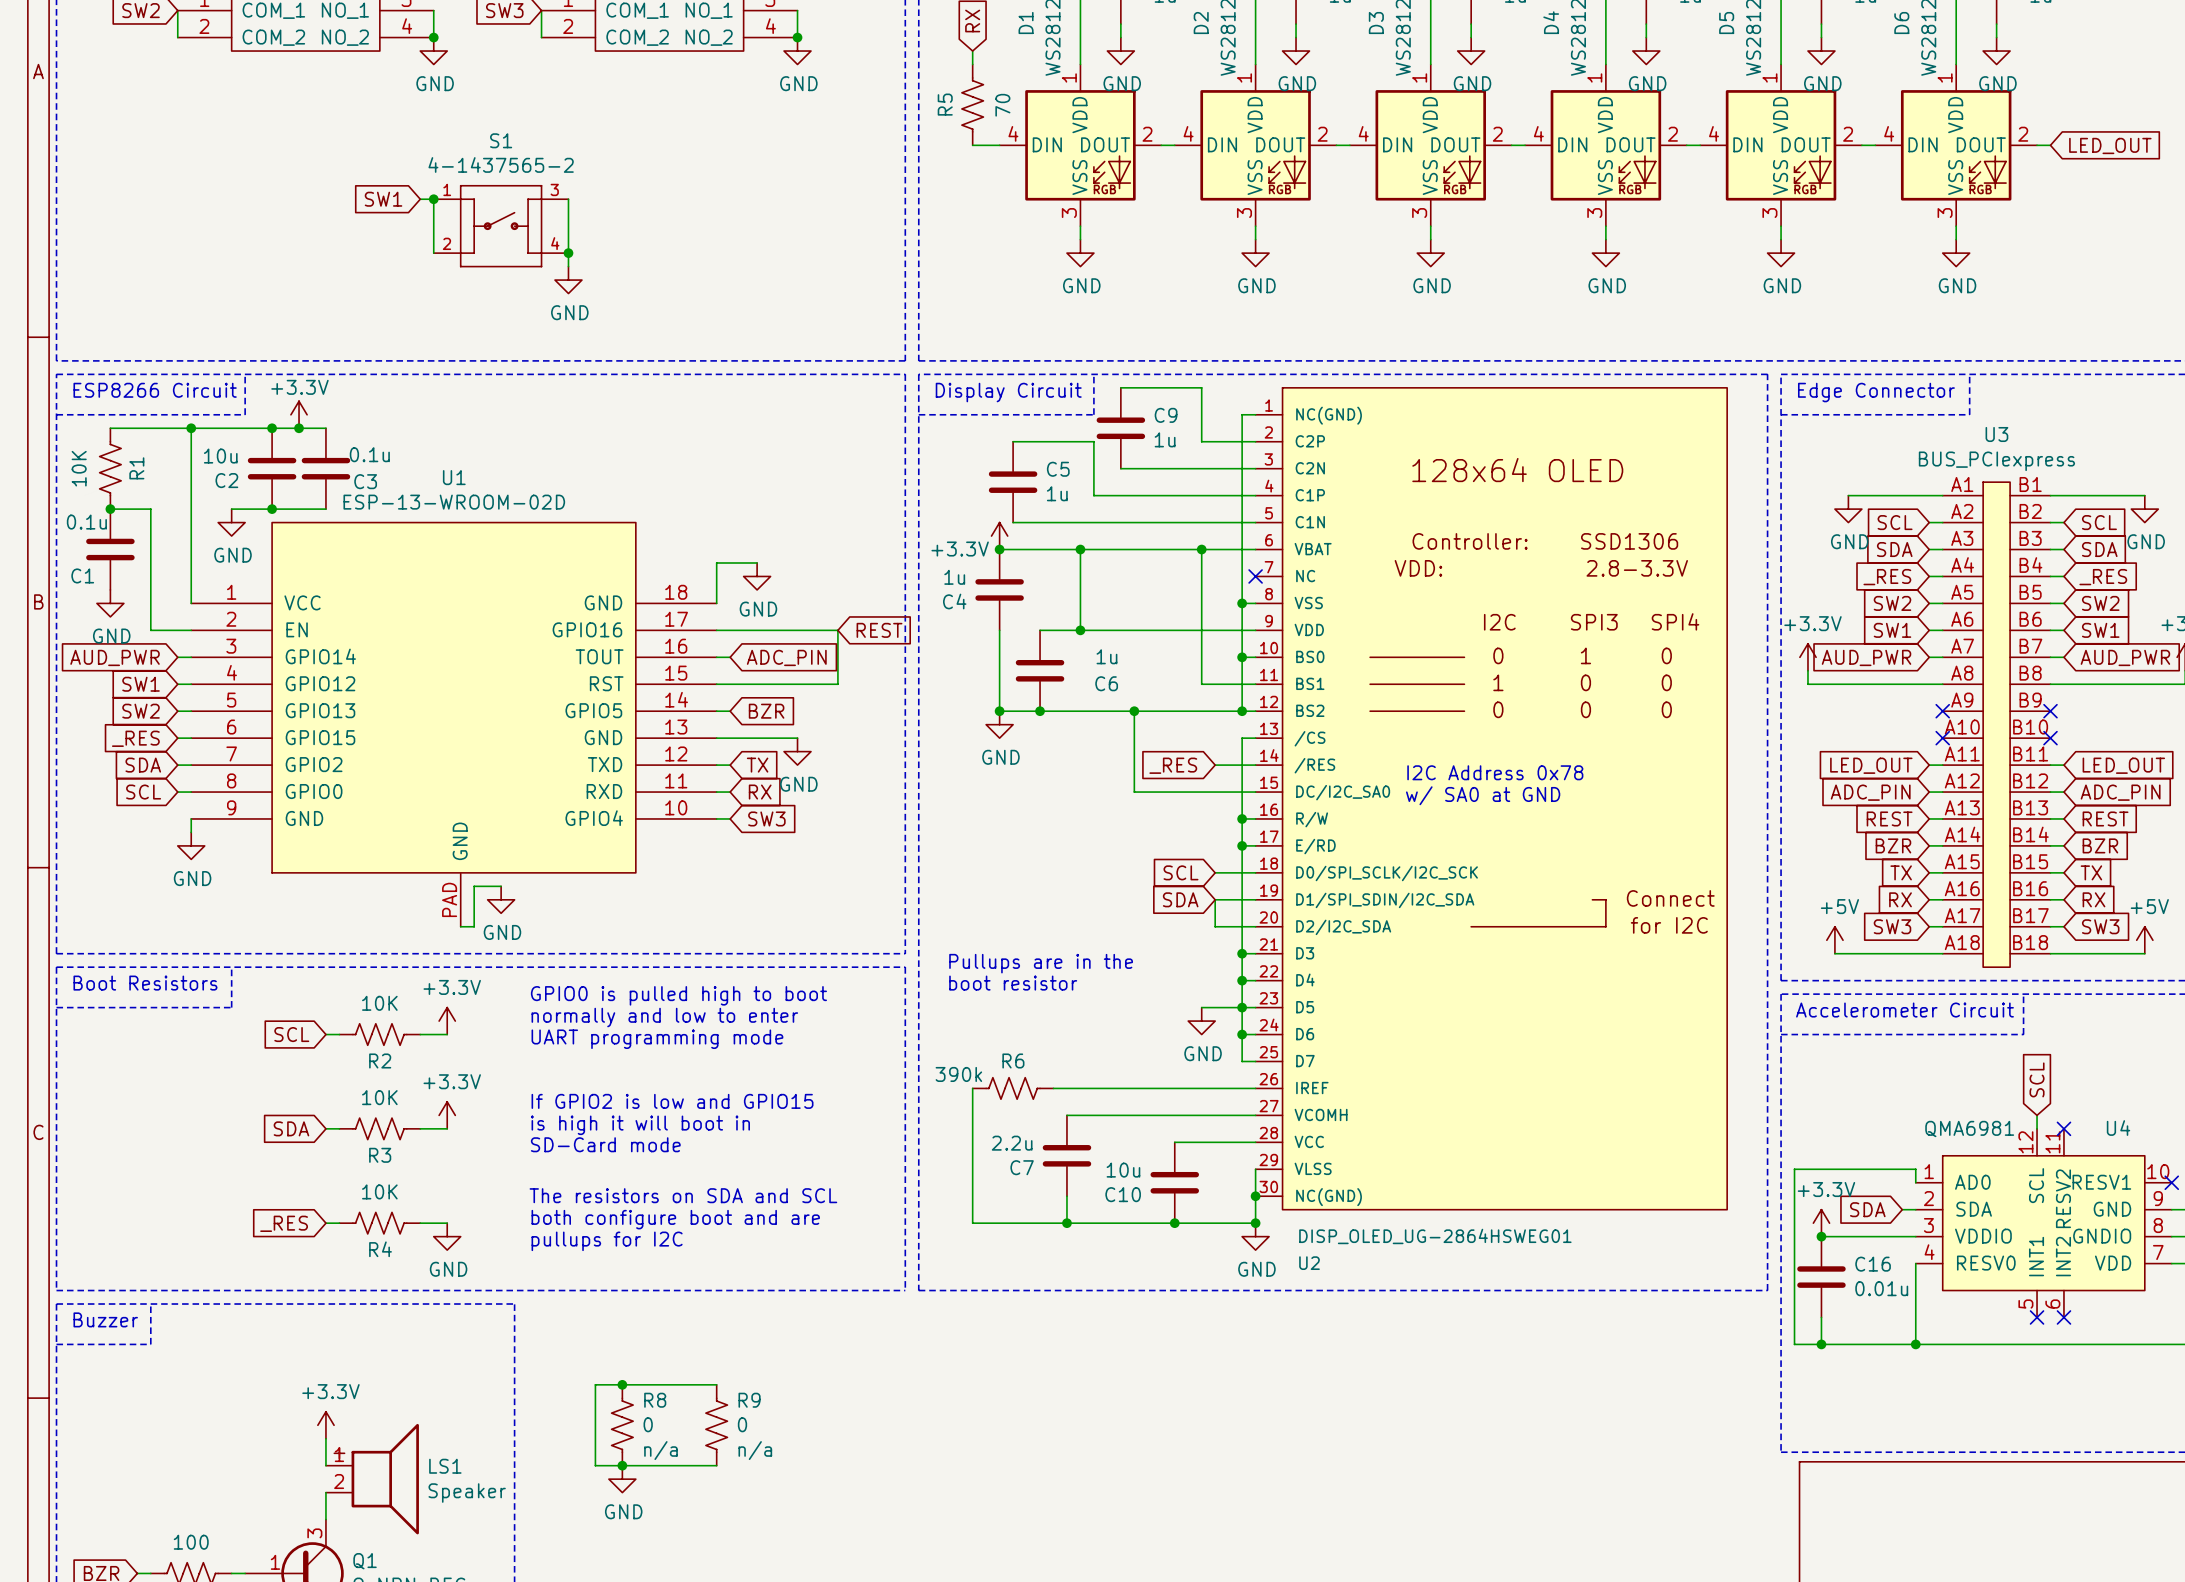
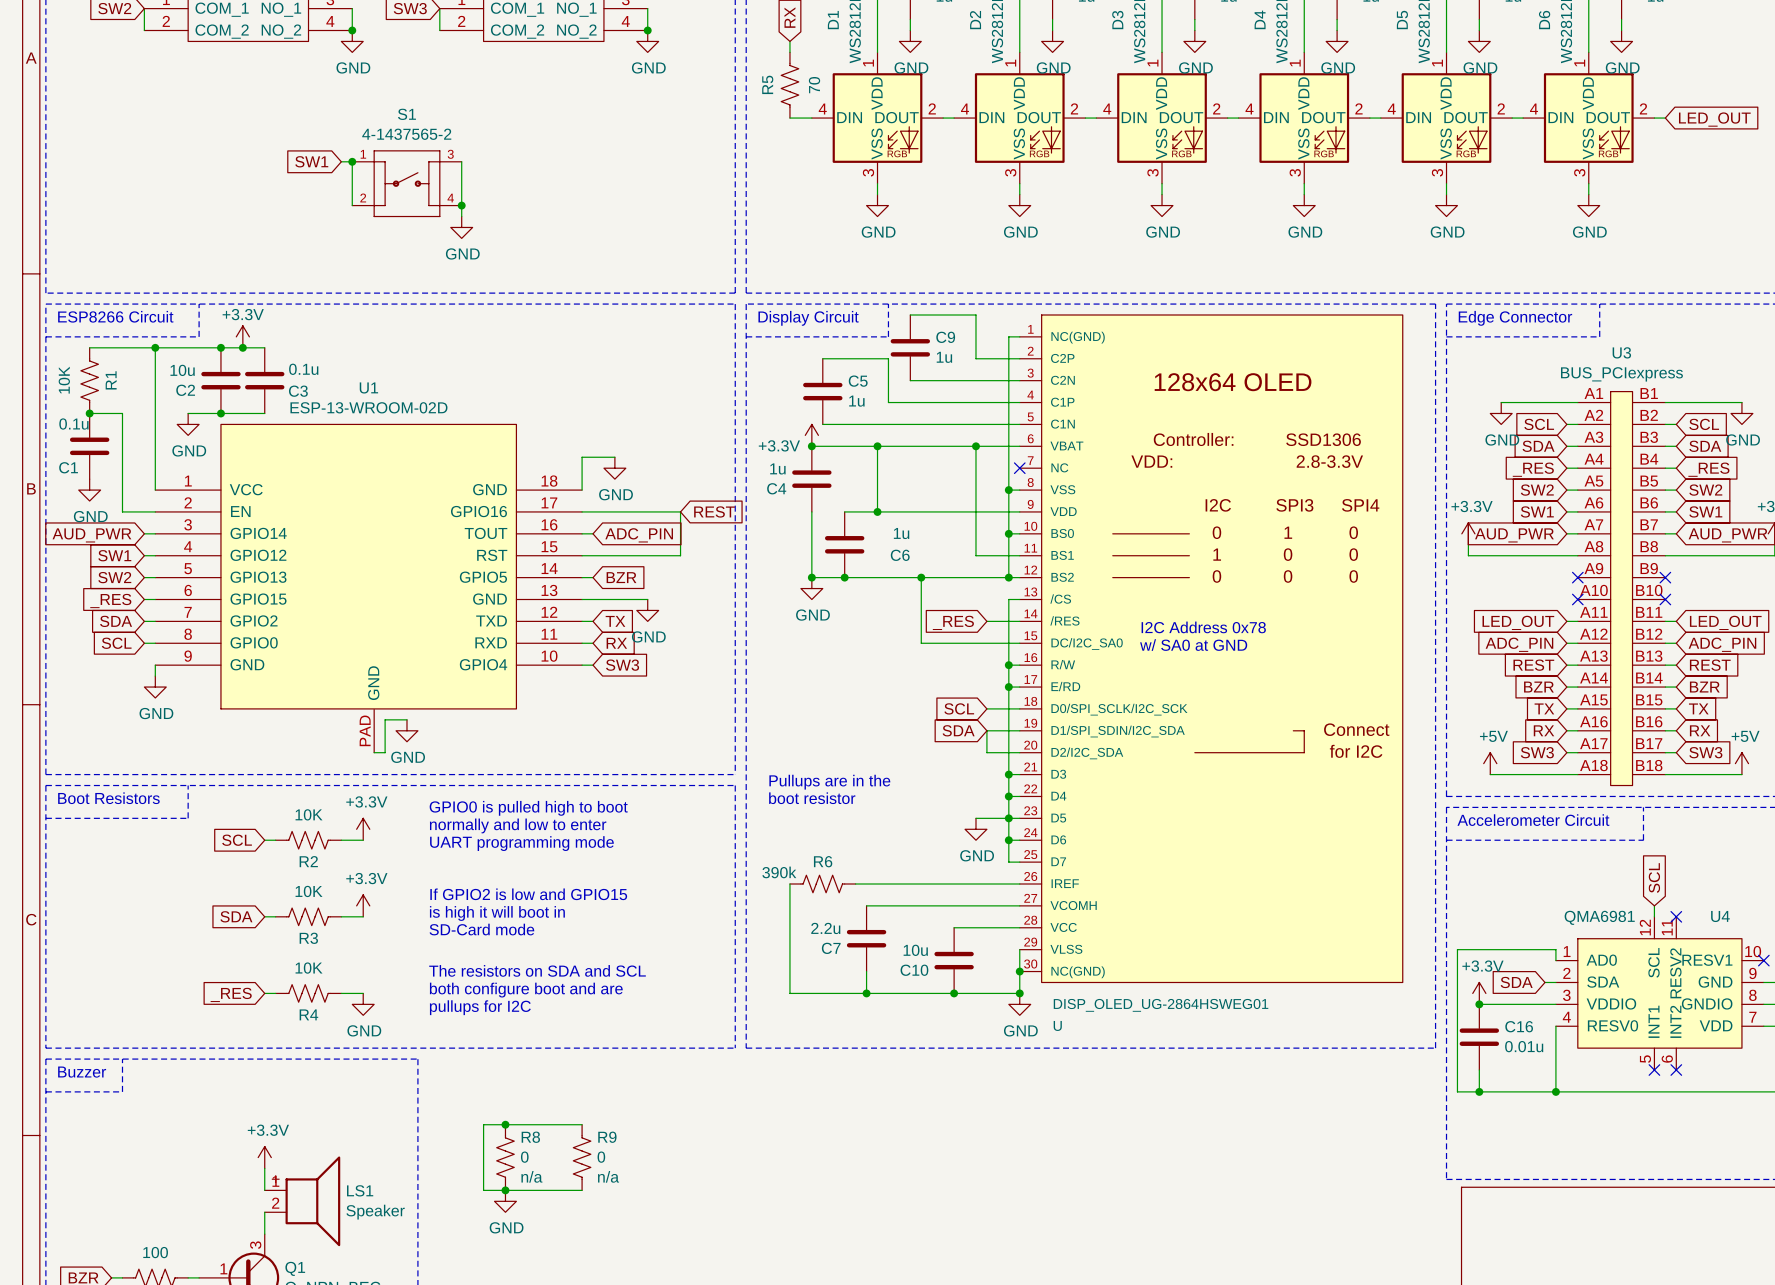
U2 name: U2 (1309, 1263) -> U (1057, 1025)

